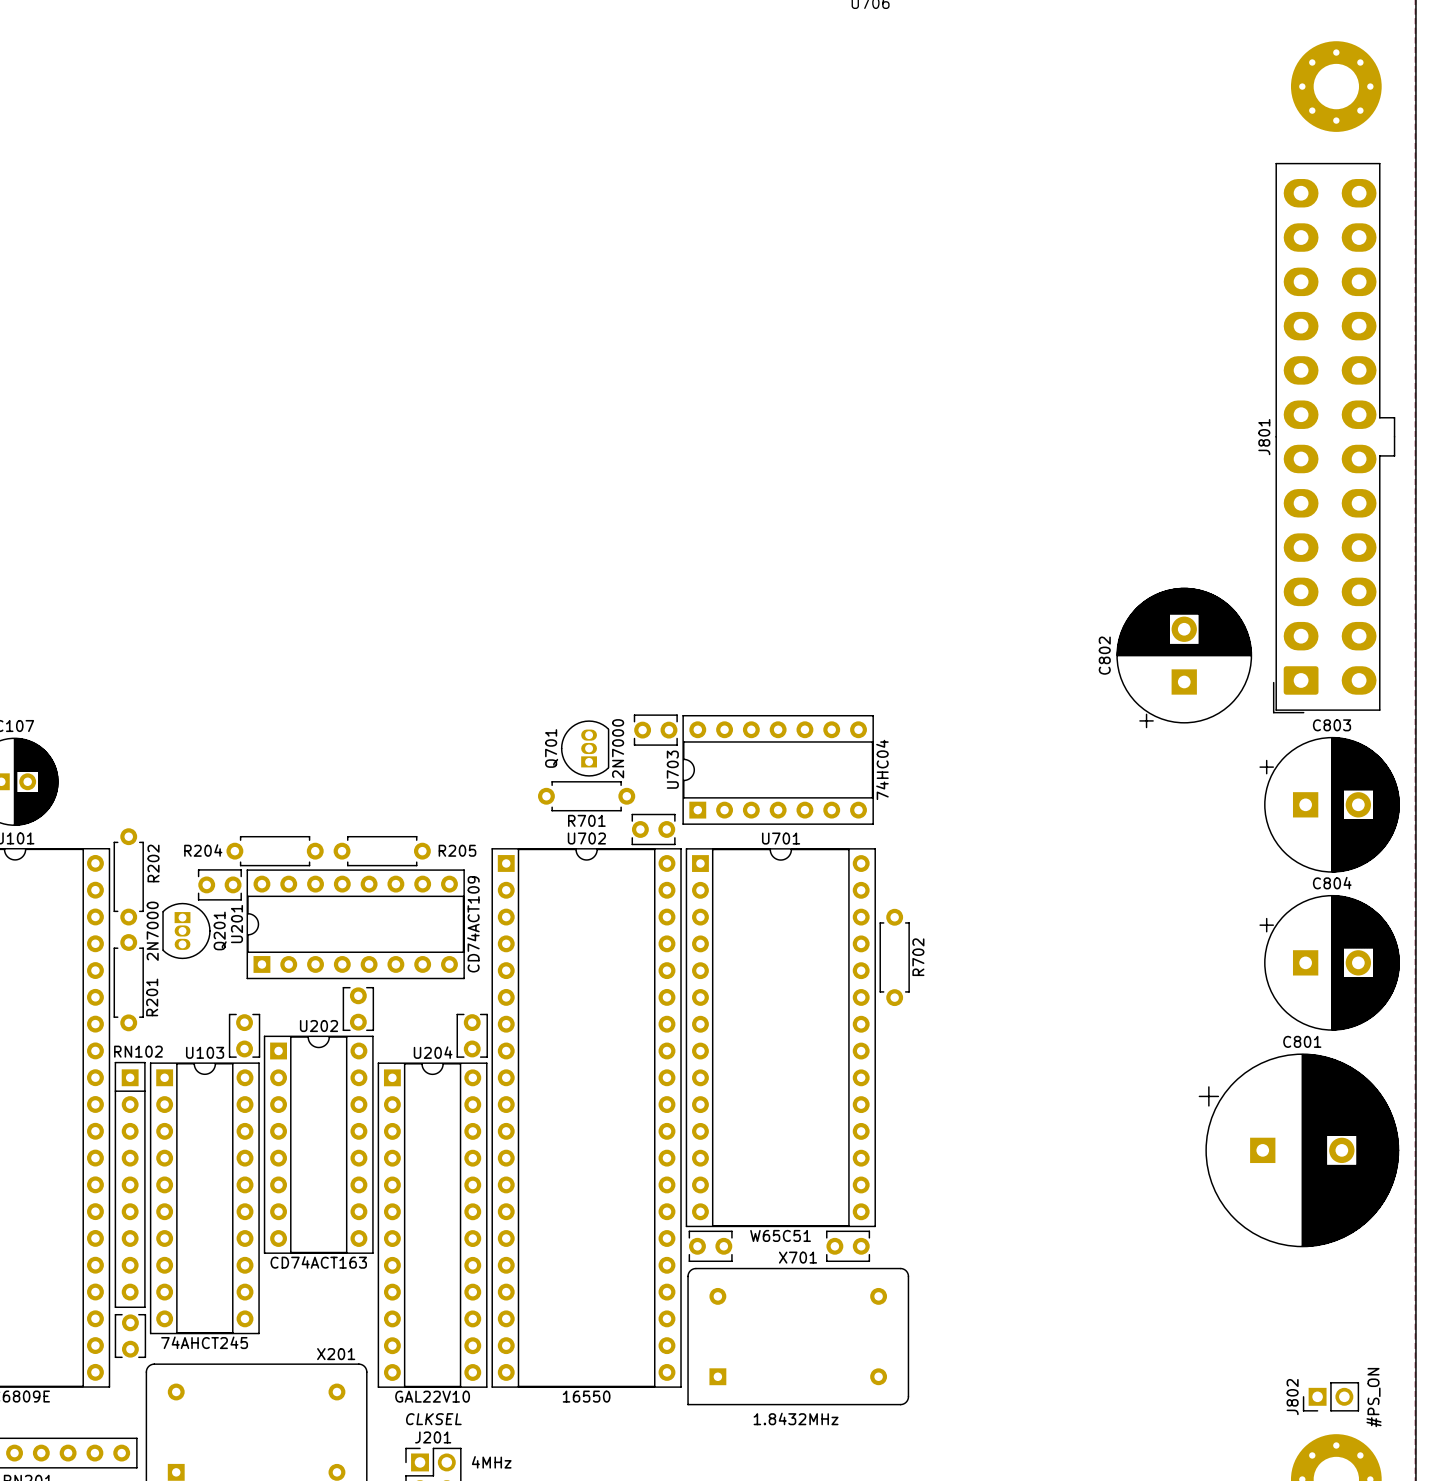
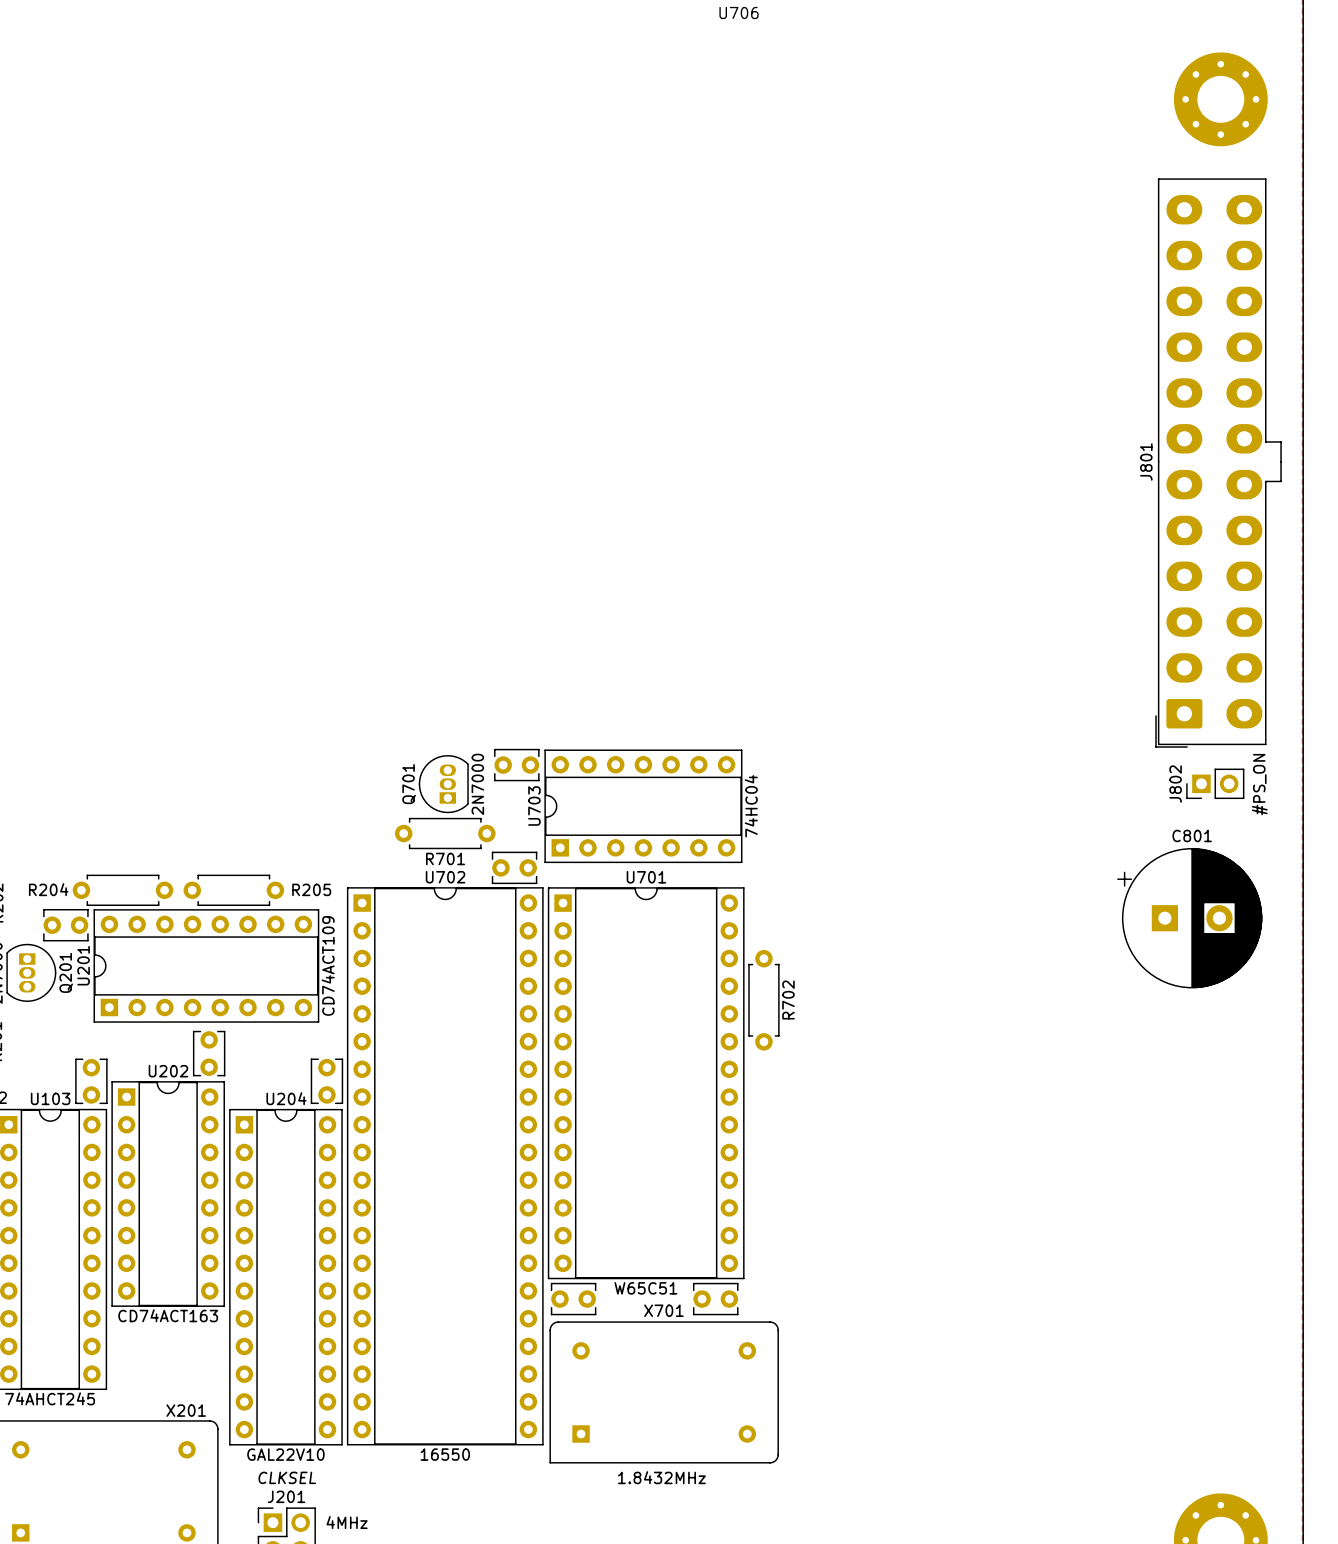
C802: (1184, 657) -> none
C803: (1329, 804) -> none
C804: (1329, 962) -> none
C801 name position: C801 (1302, 1041) -> C801 (1192, 835)
C801 footprint: [1198, 1053, 1400, 1248] -> [1117, 848, 1263, 989]
J802 position: (1330, 1396) -> (1215, 783)

